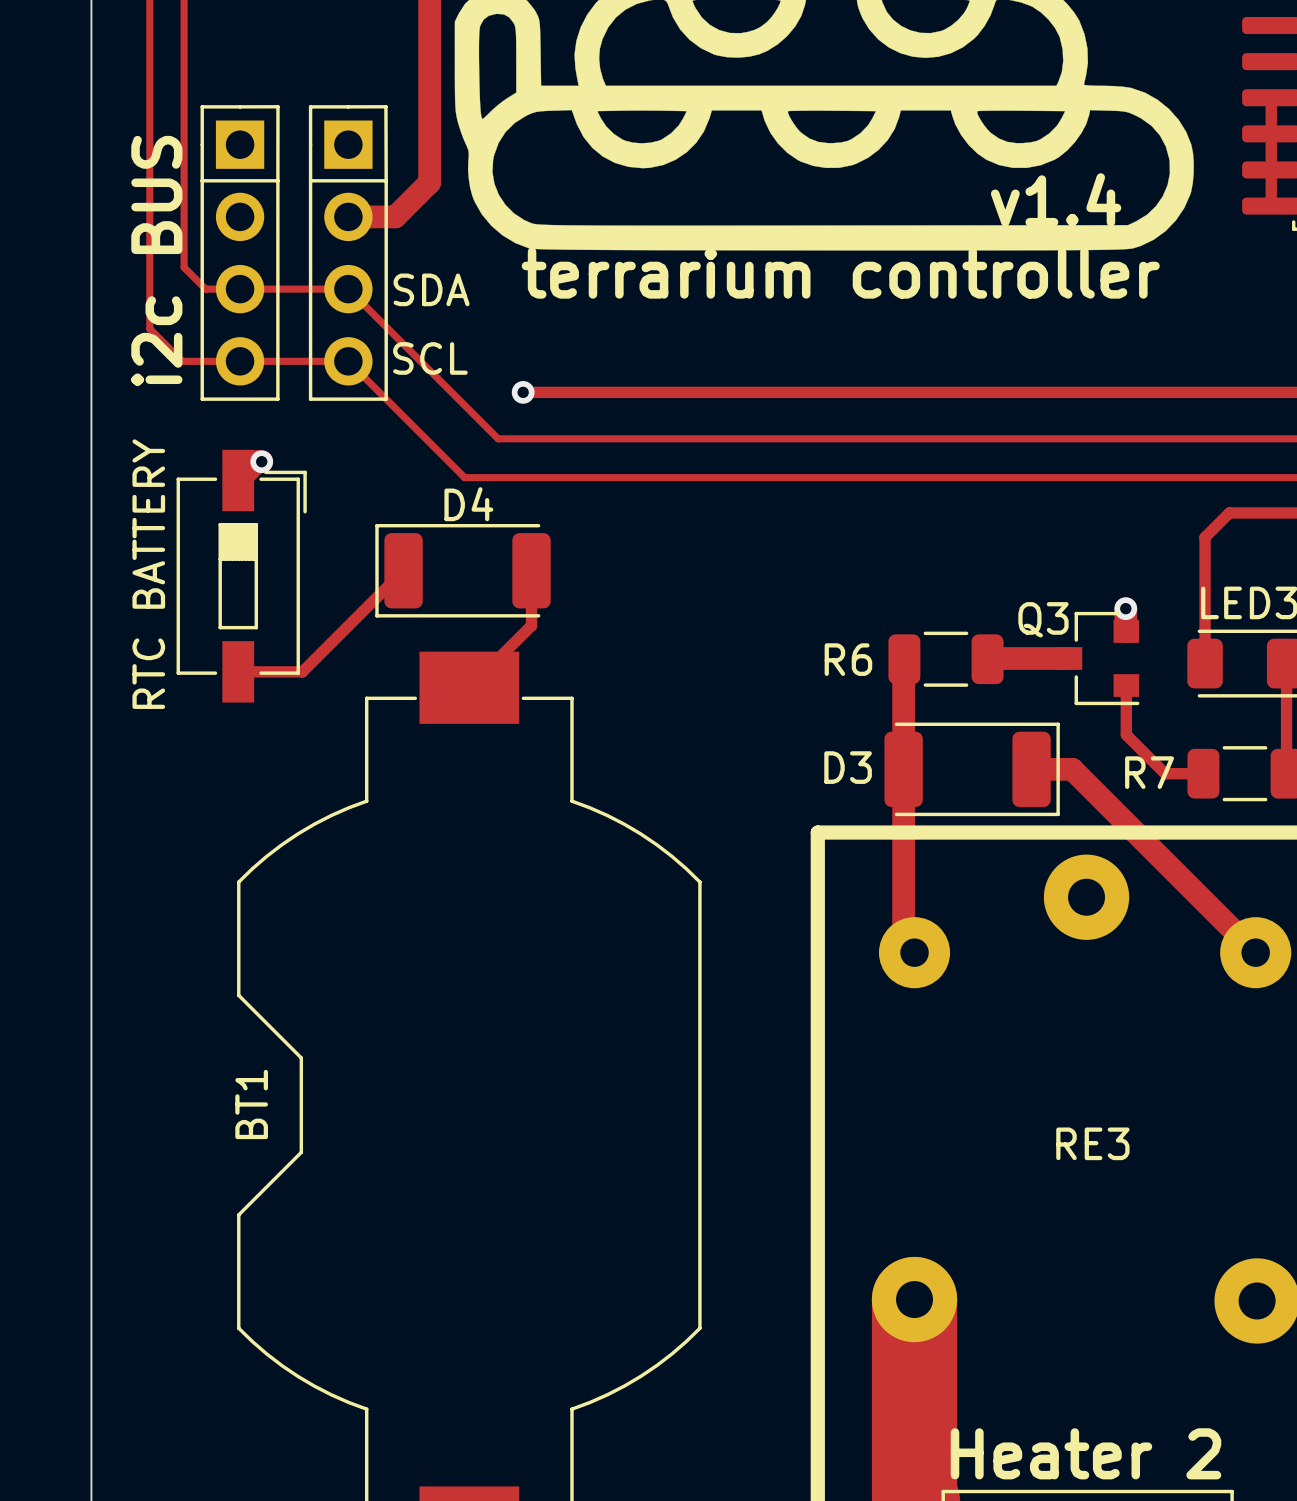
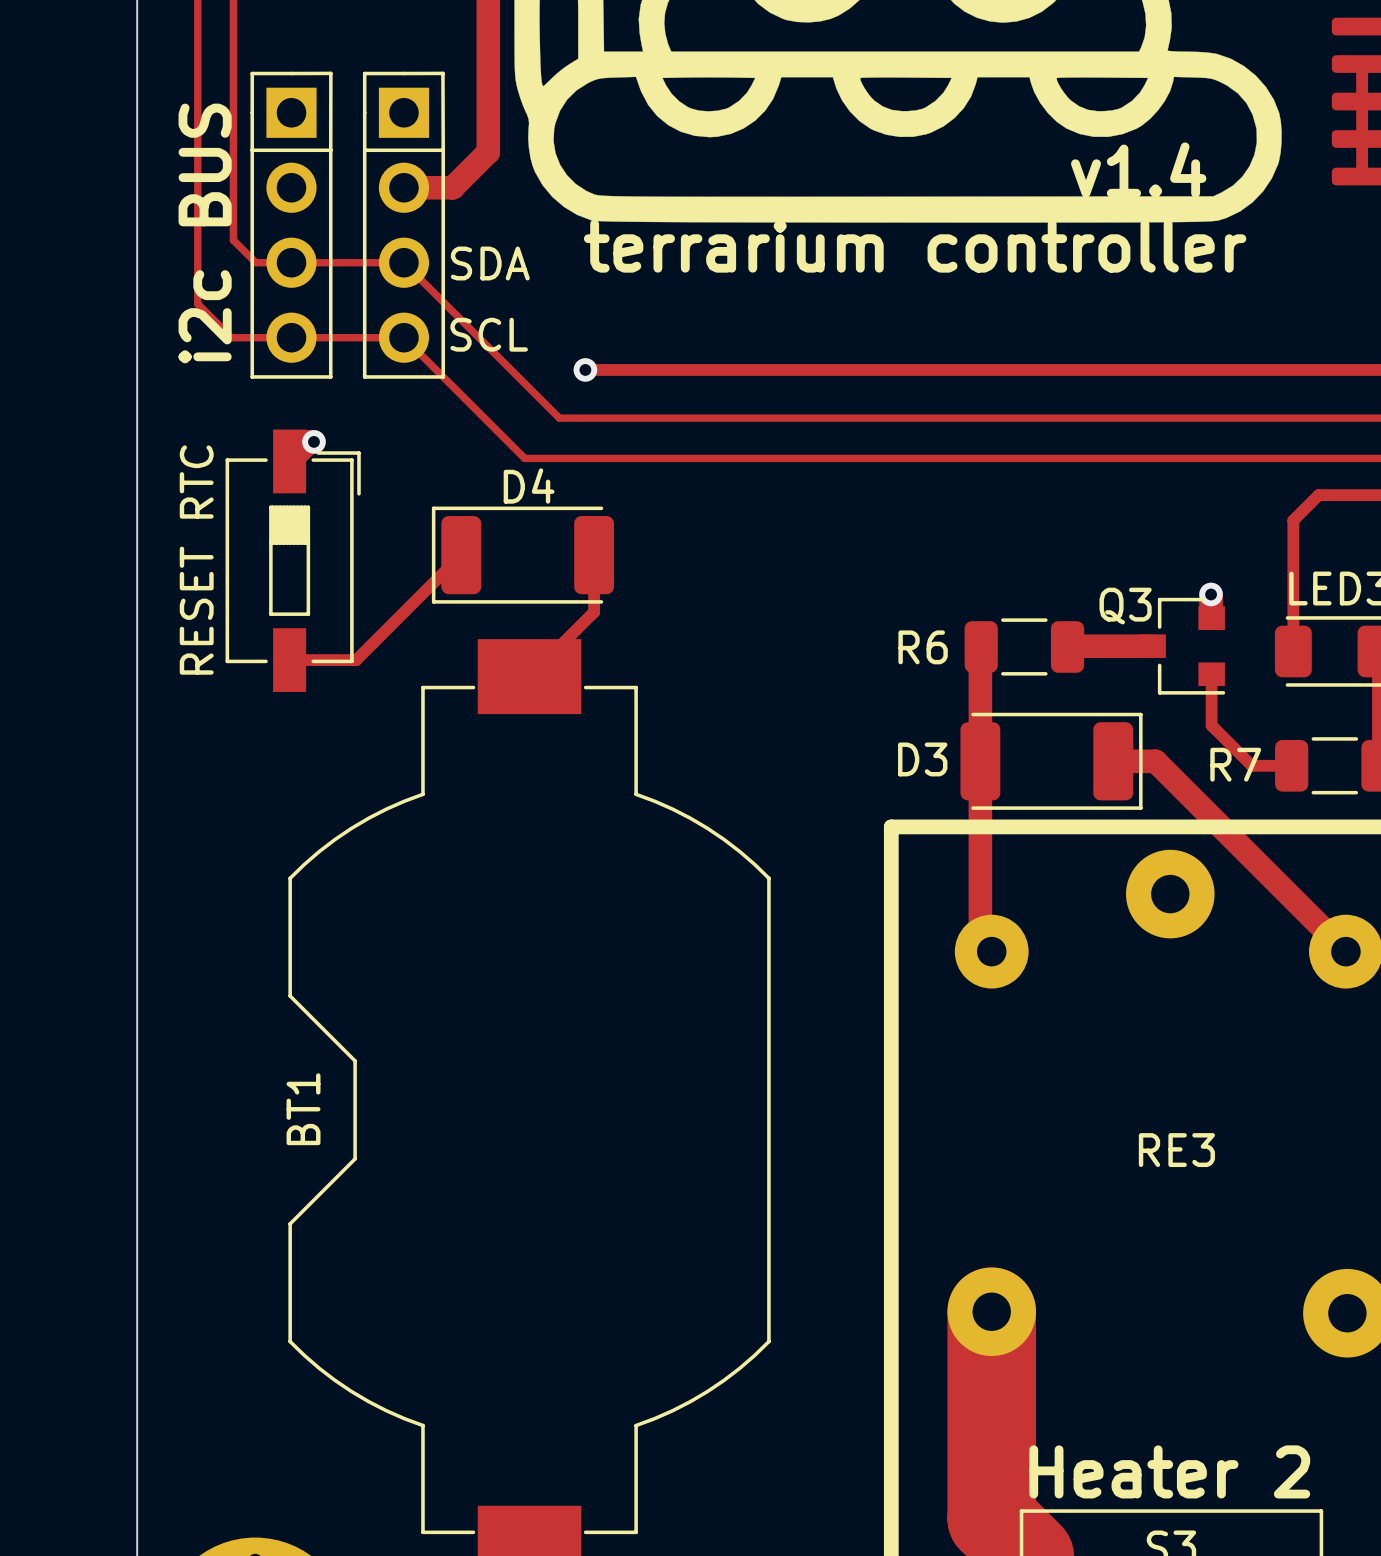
part value: RTC BATTERY (148, 574) -> RESET RTC (196, 560)

